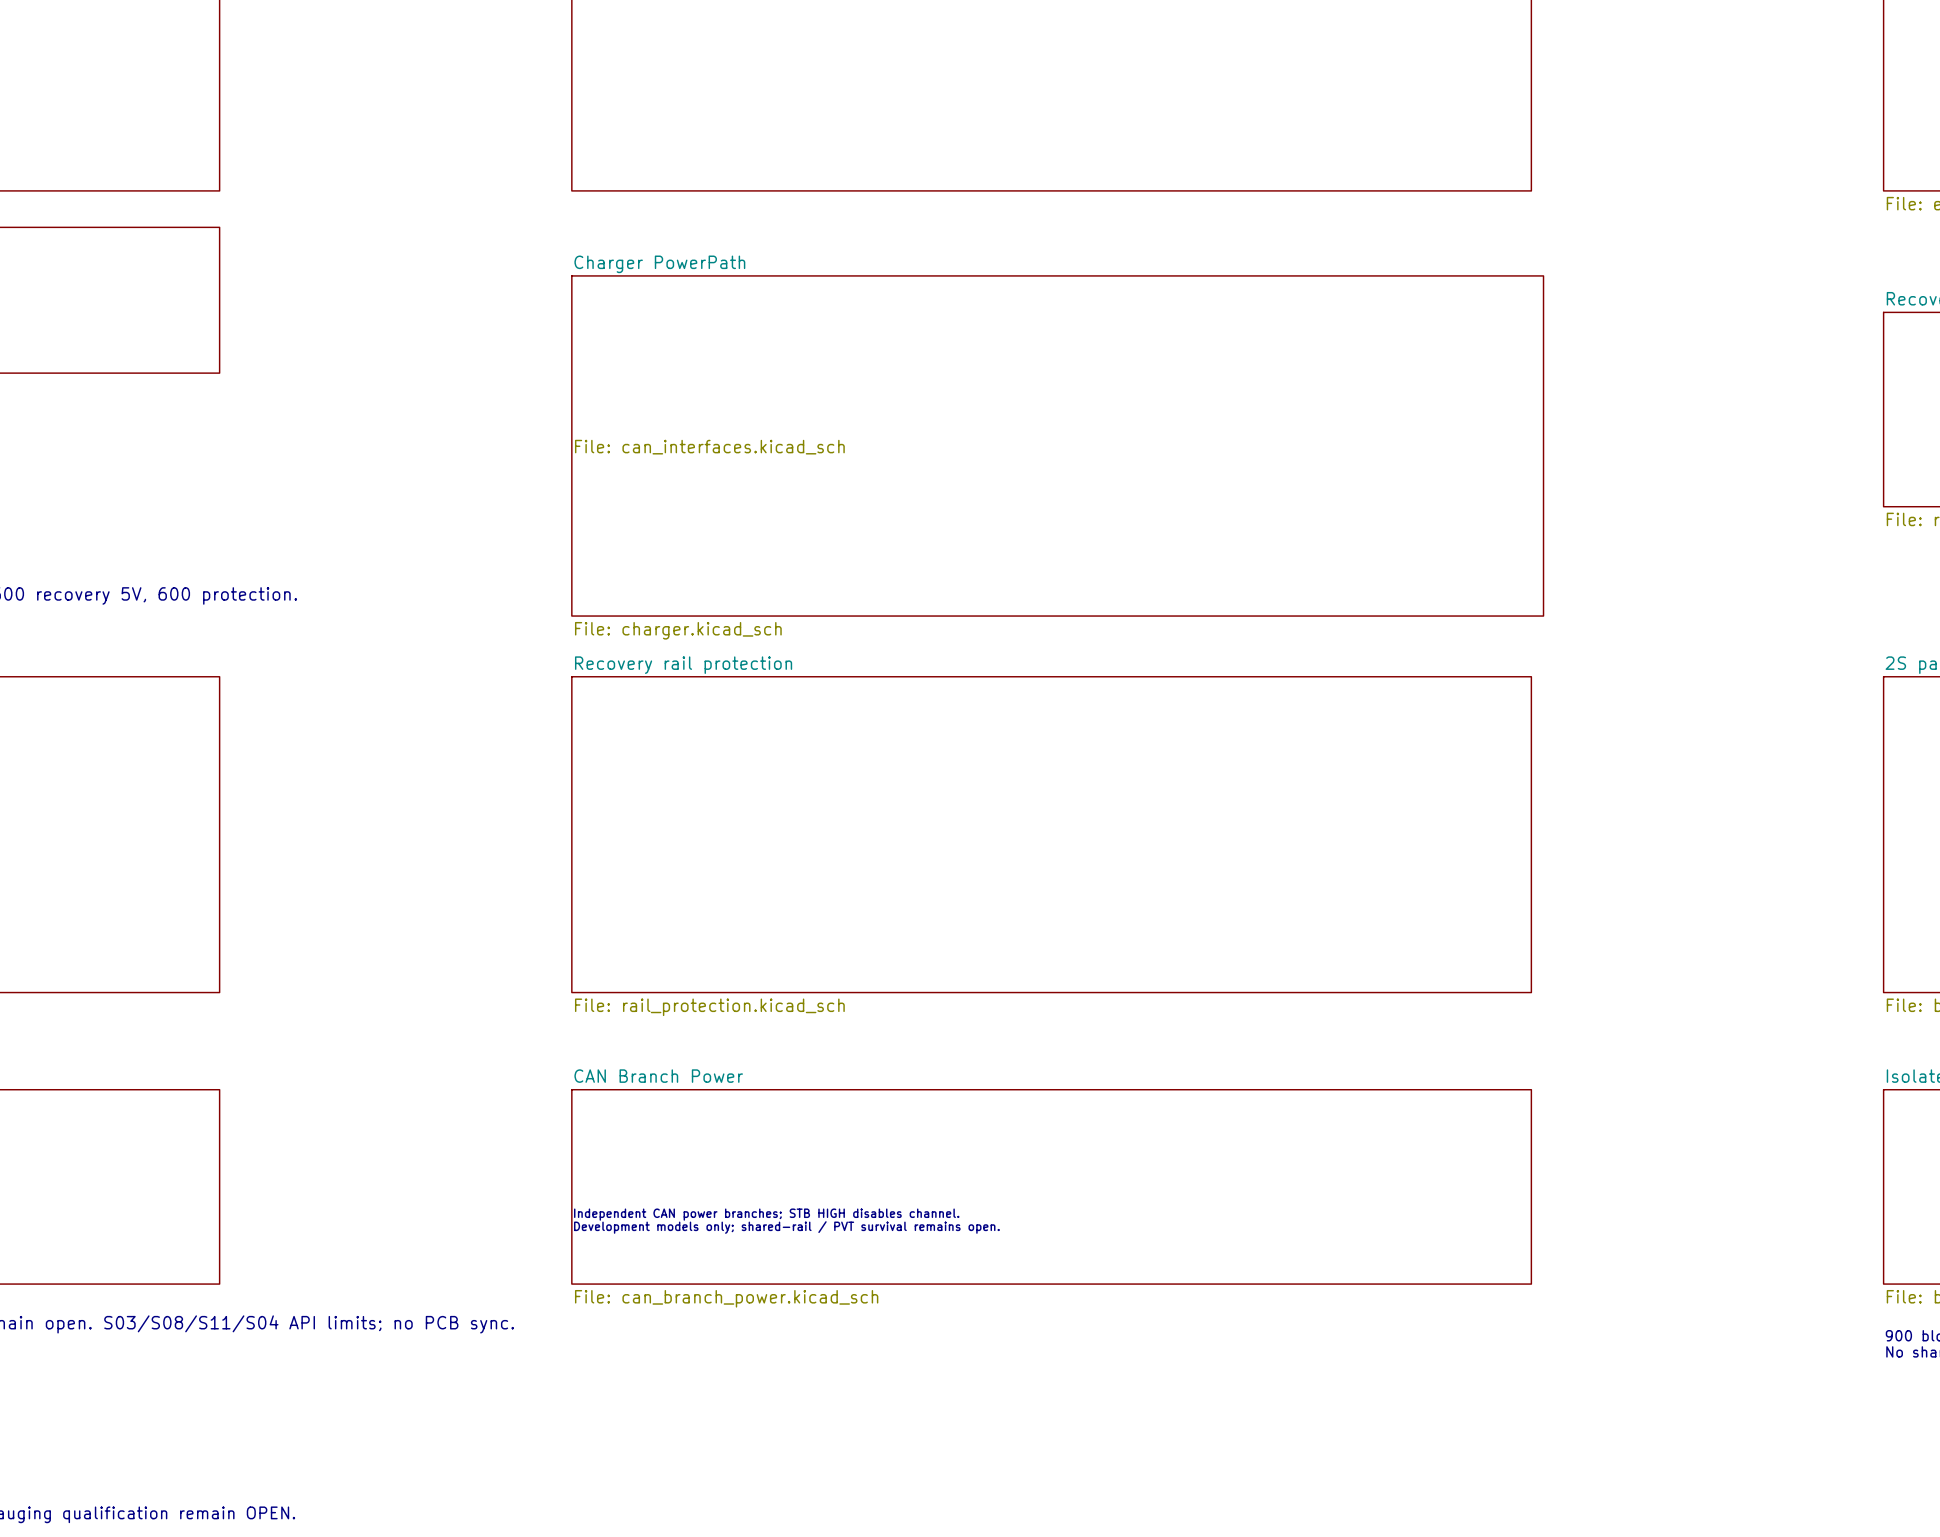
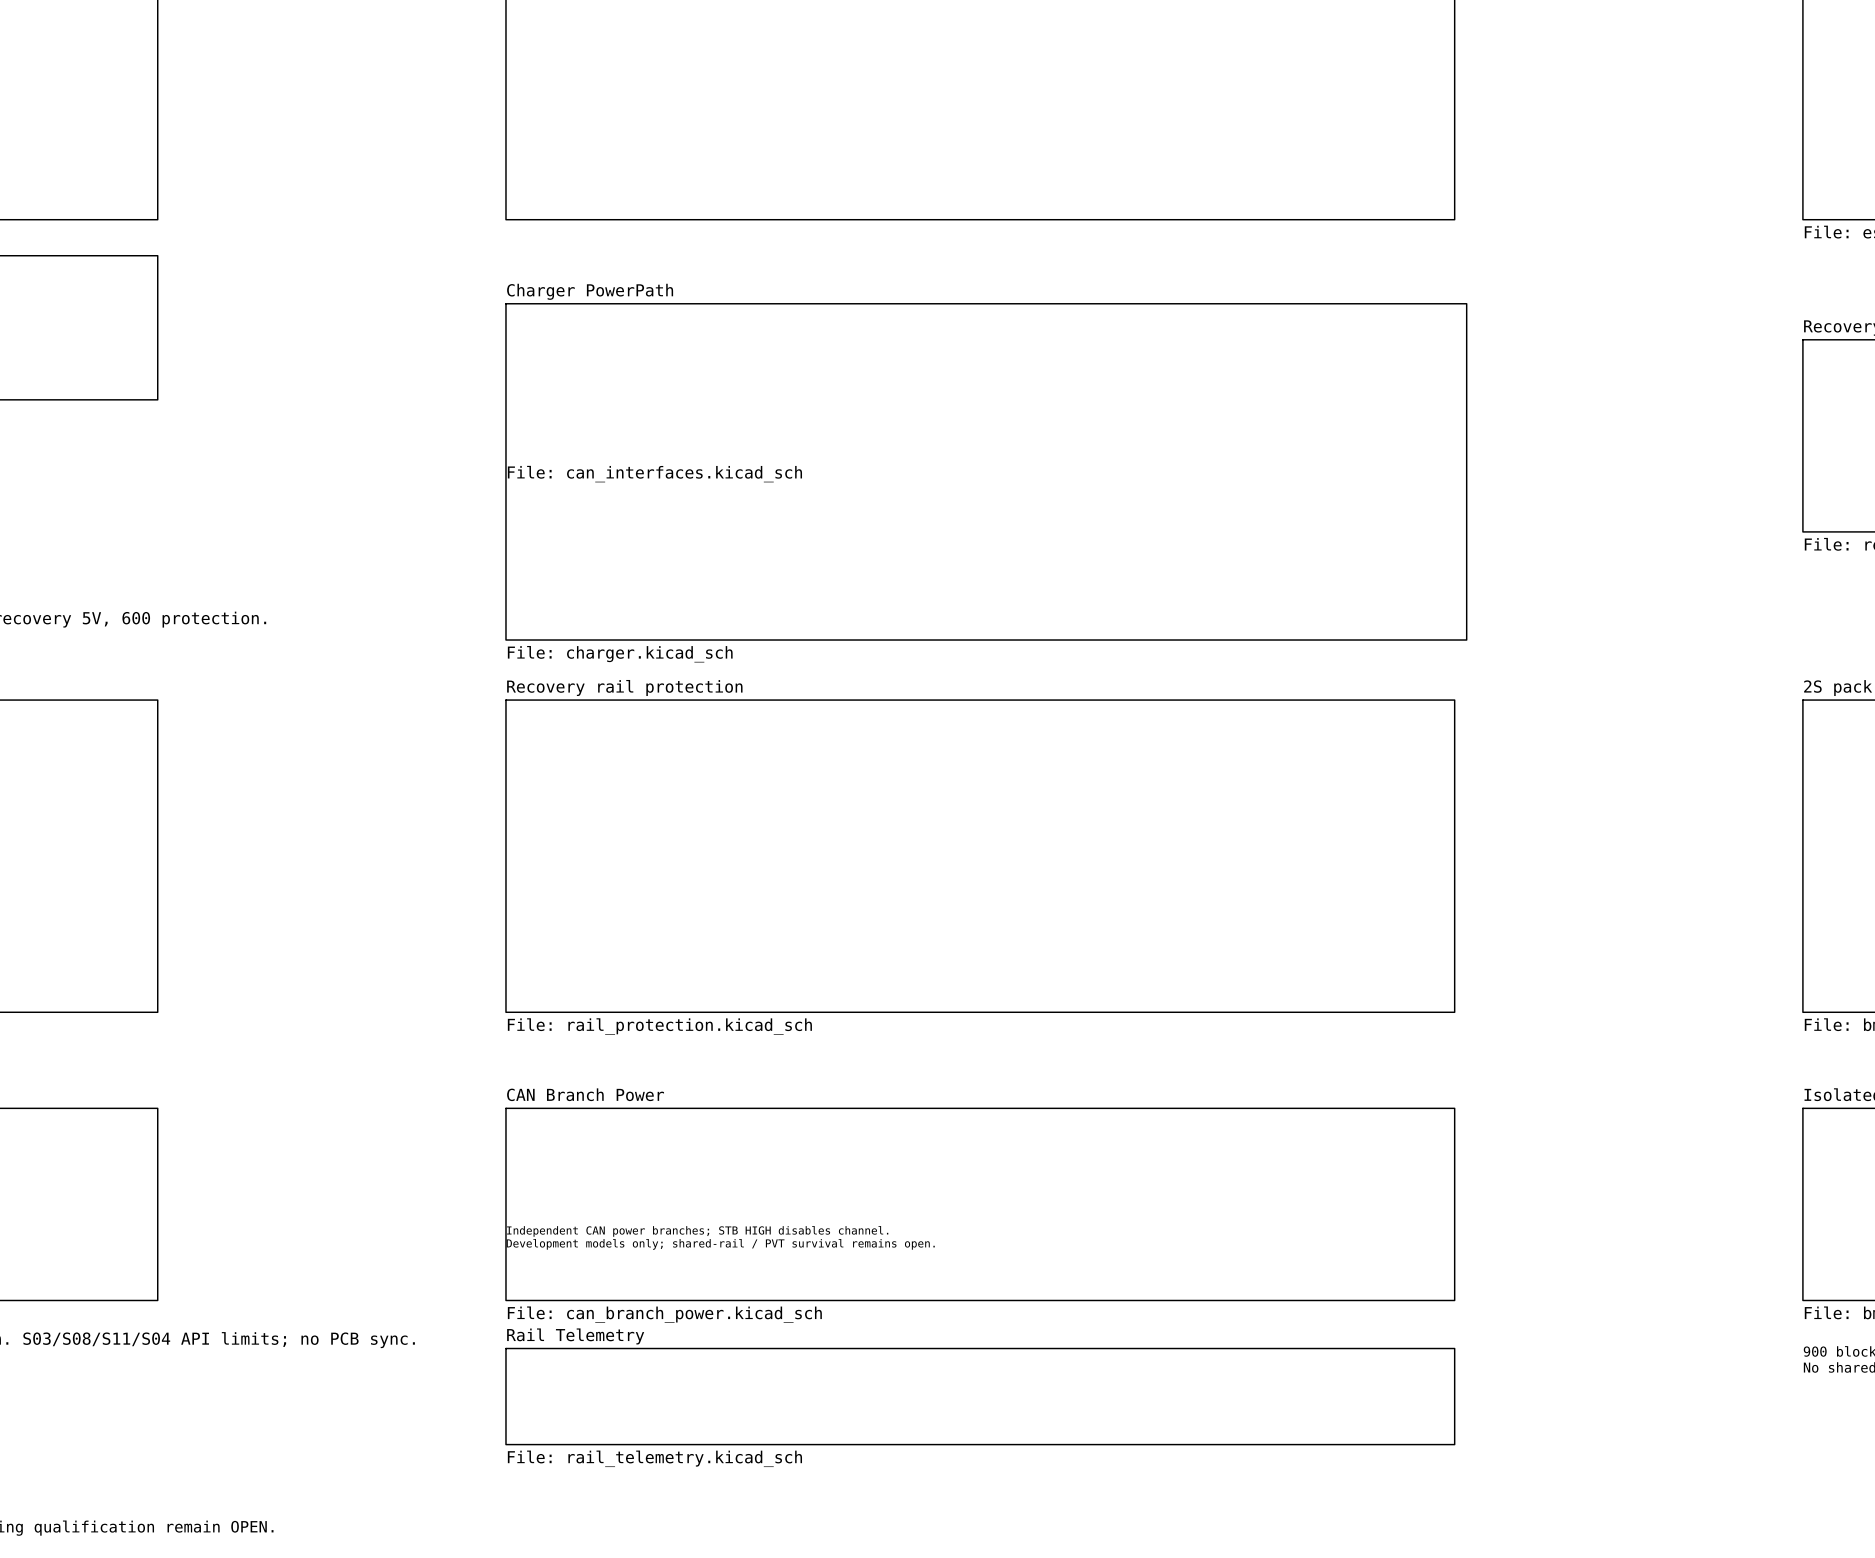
sheet Rail Telemetry: none -> File: rail_telemetry.kicad_sch (980, 1396)

